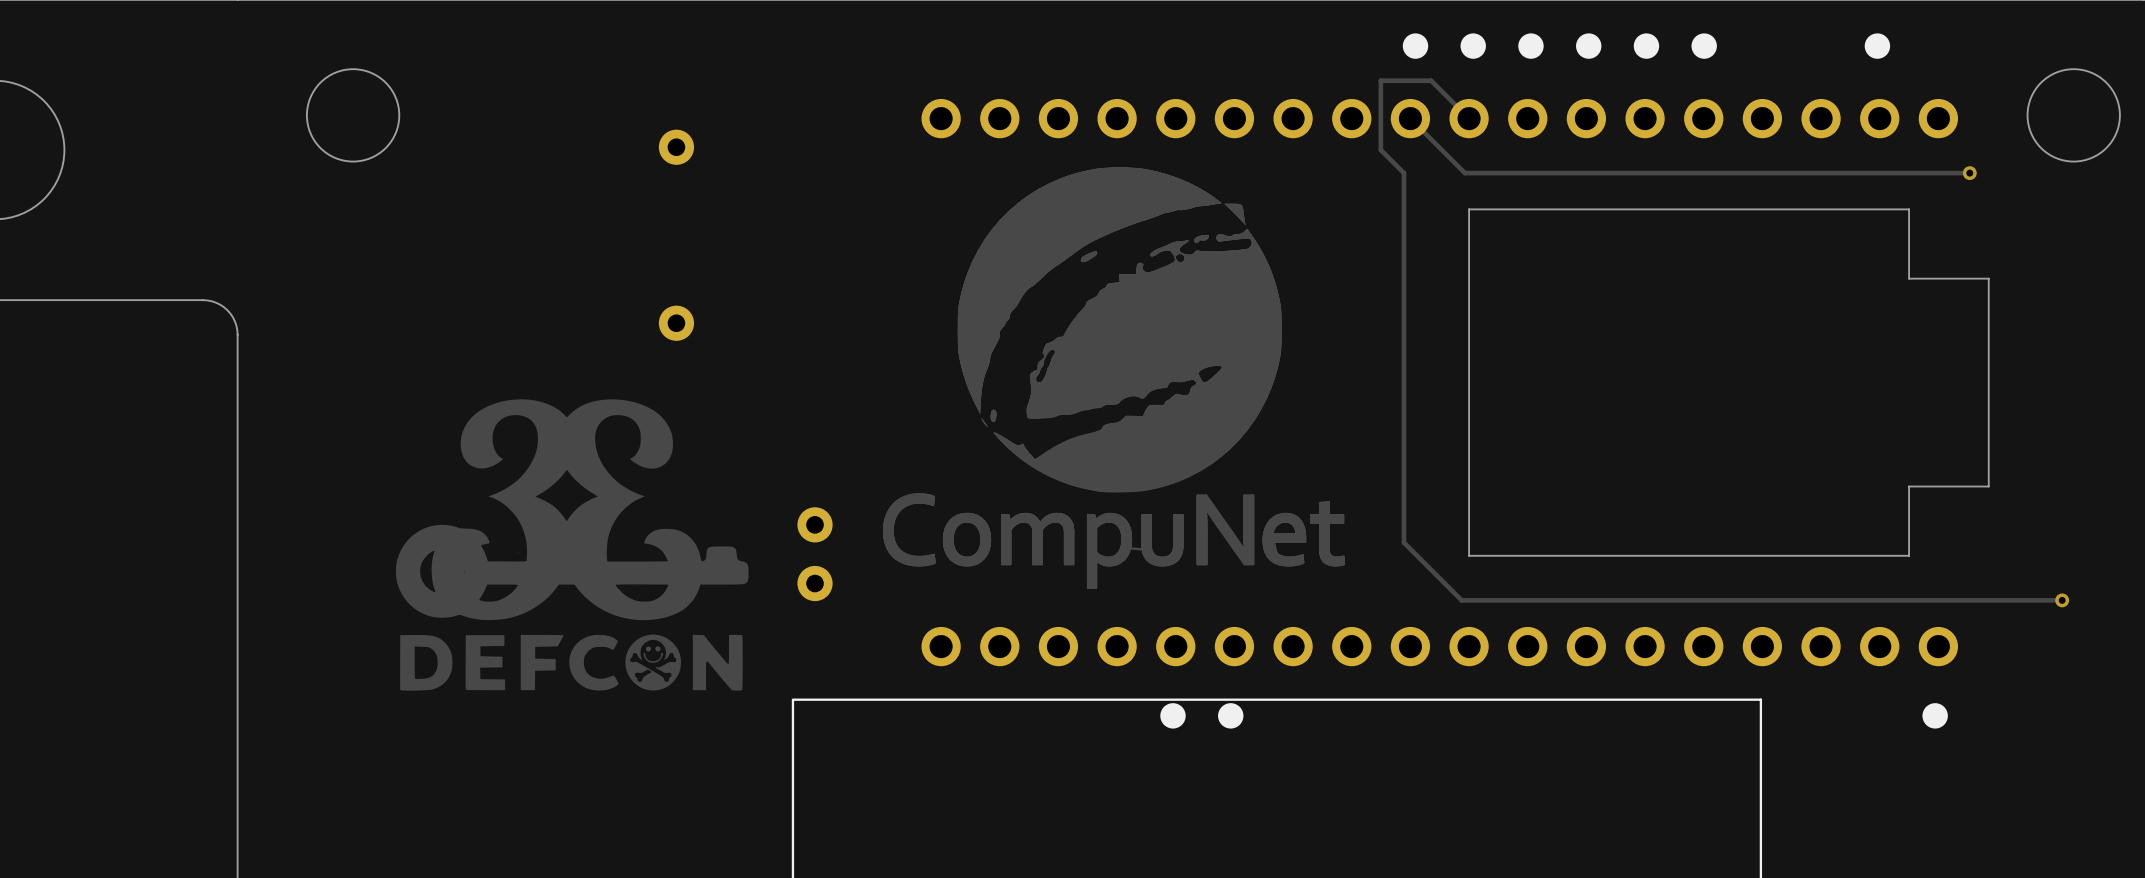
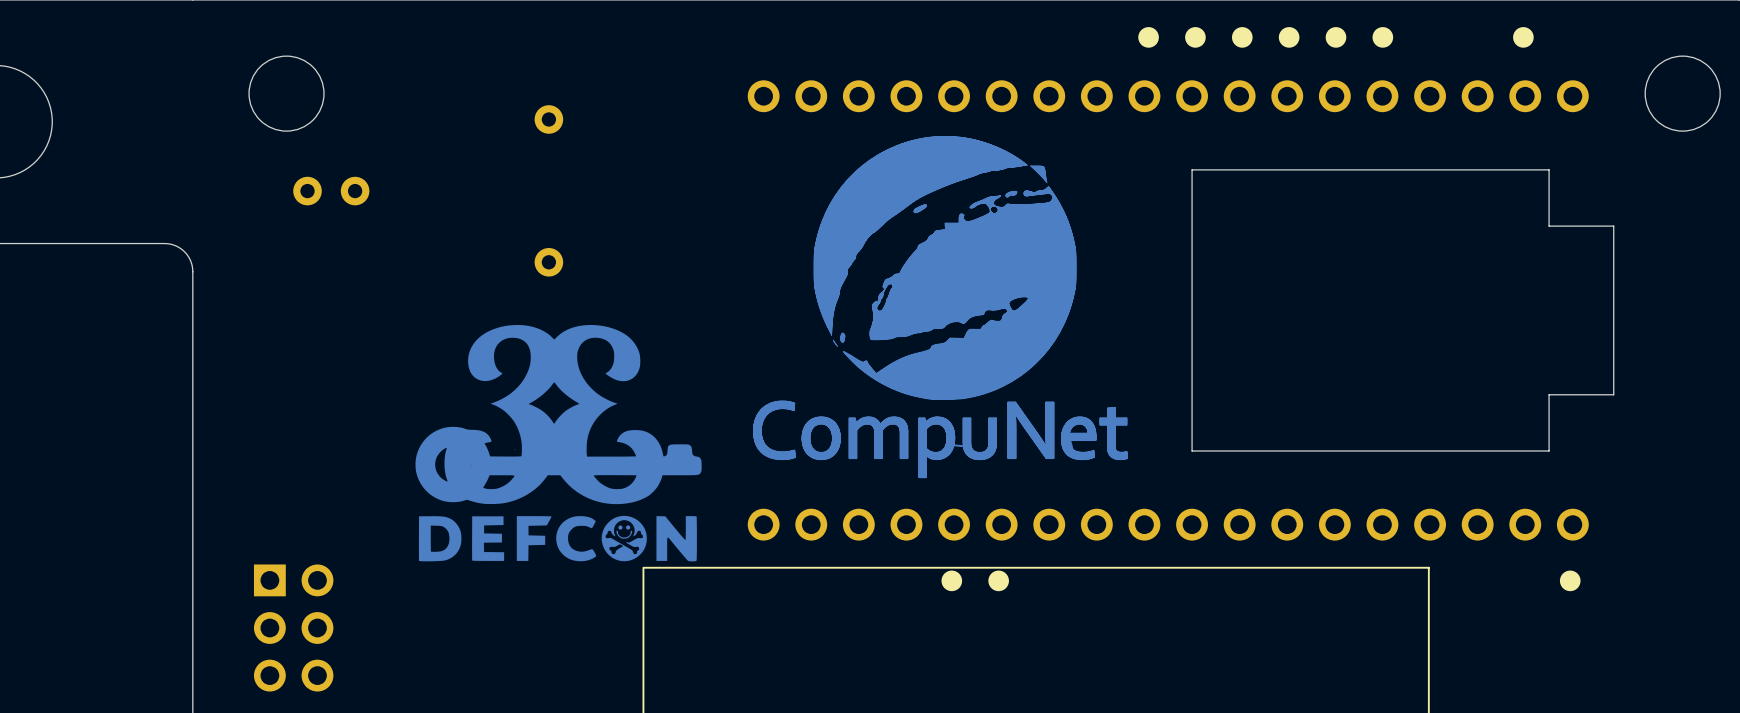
track: (1410, 118) (1464, 173) (1969, 173) -> none
track: (1469, 118) (1431, 80) (1380, 80) (1380, 150) (1403, 173) (1403, 542) (1461, 600) (2062, 600) -> none
via: (1969, 173) -> none
drawing position: (1114, 378) -> (940, 307)
drawing position: (572, 545) -> (558, 443)
part rotation: 0° (815, 554) -> 90° clockwise (331, 191)
part position: (815, 554) -> (331, 191)
via: (2062, 600) -> none
part: none -> (293, 628)

